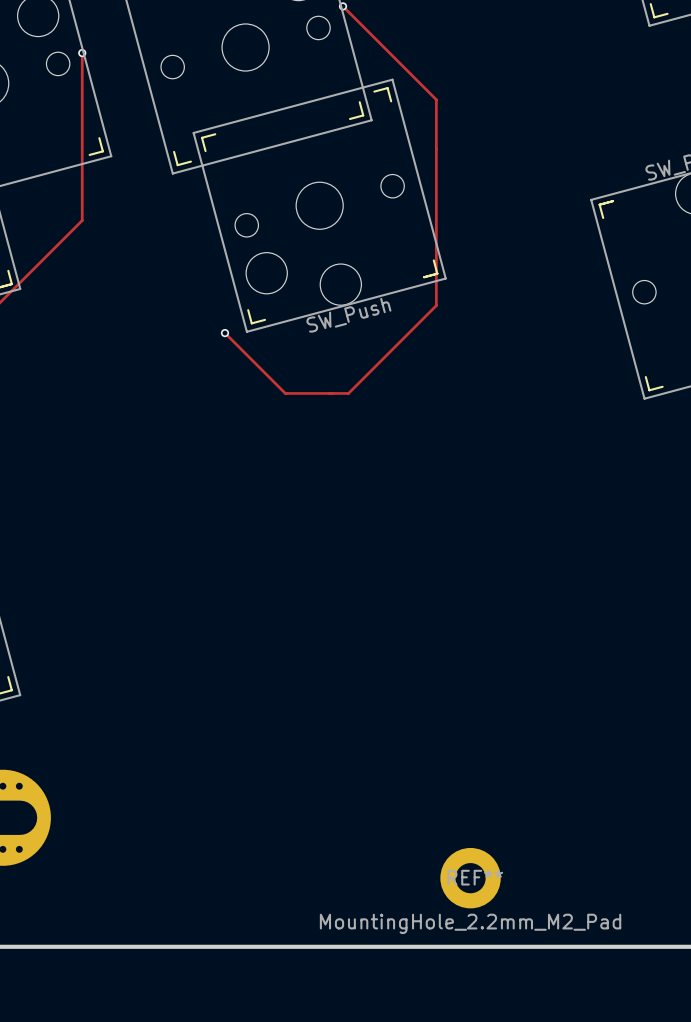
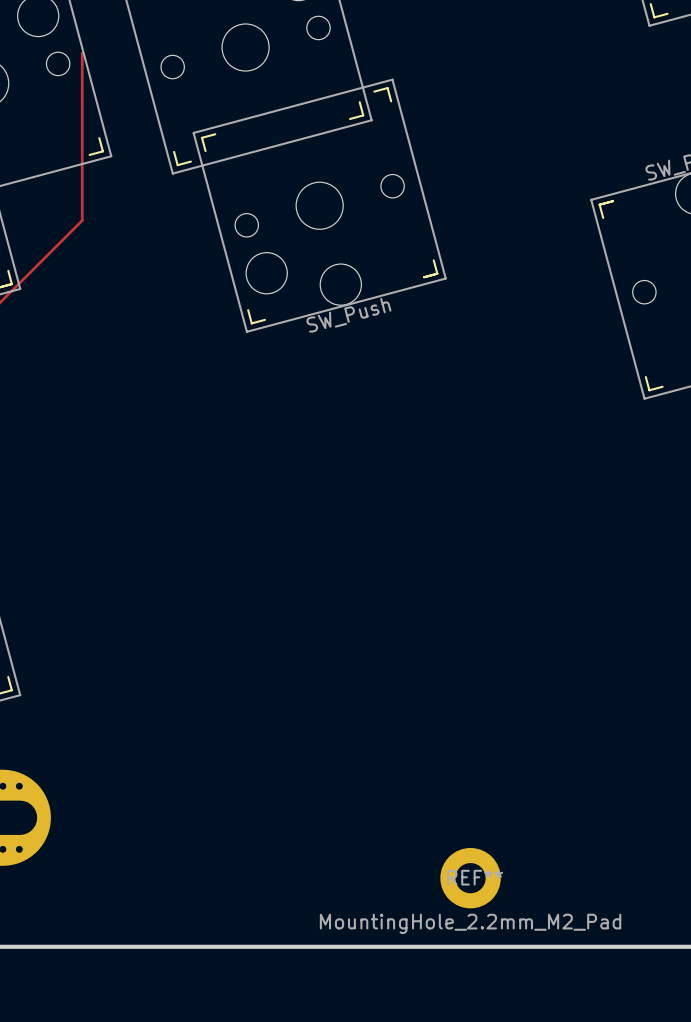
track: (343, 6) (436, 99) (436, 305) (348, 393) (285, 393) (224, 333) -> none
via: (343, 6) -> none
via: (82, 53) -> none
via: (224, 333) -> none

